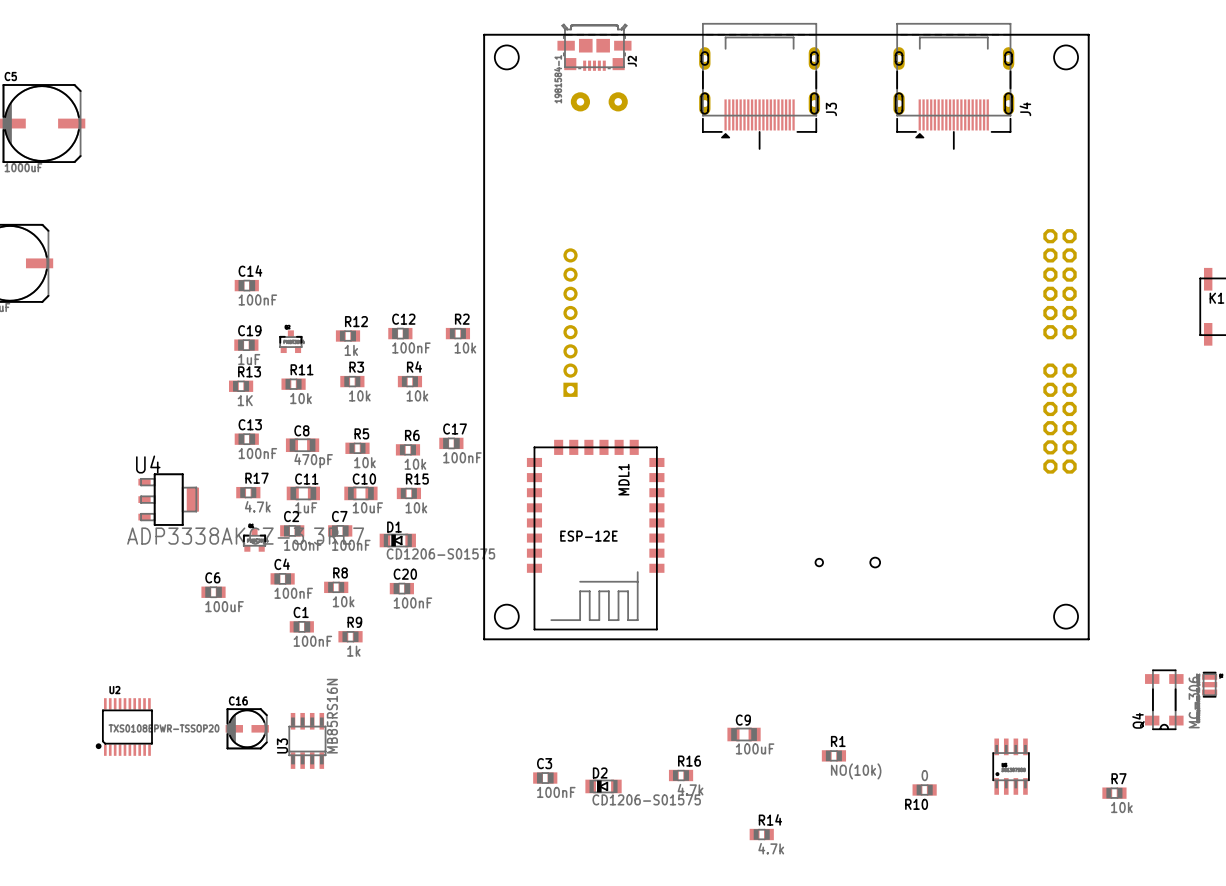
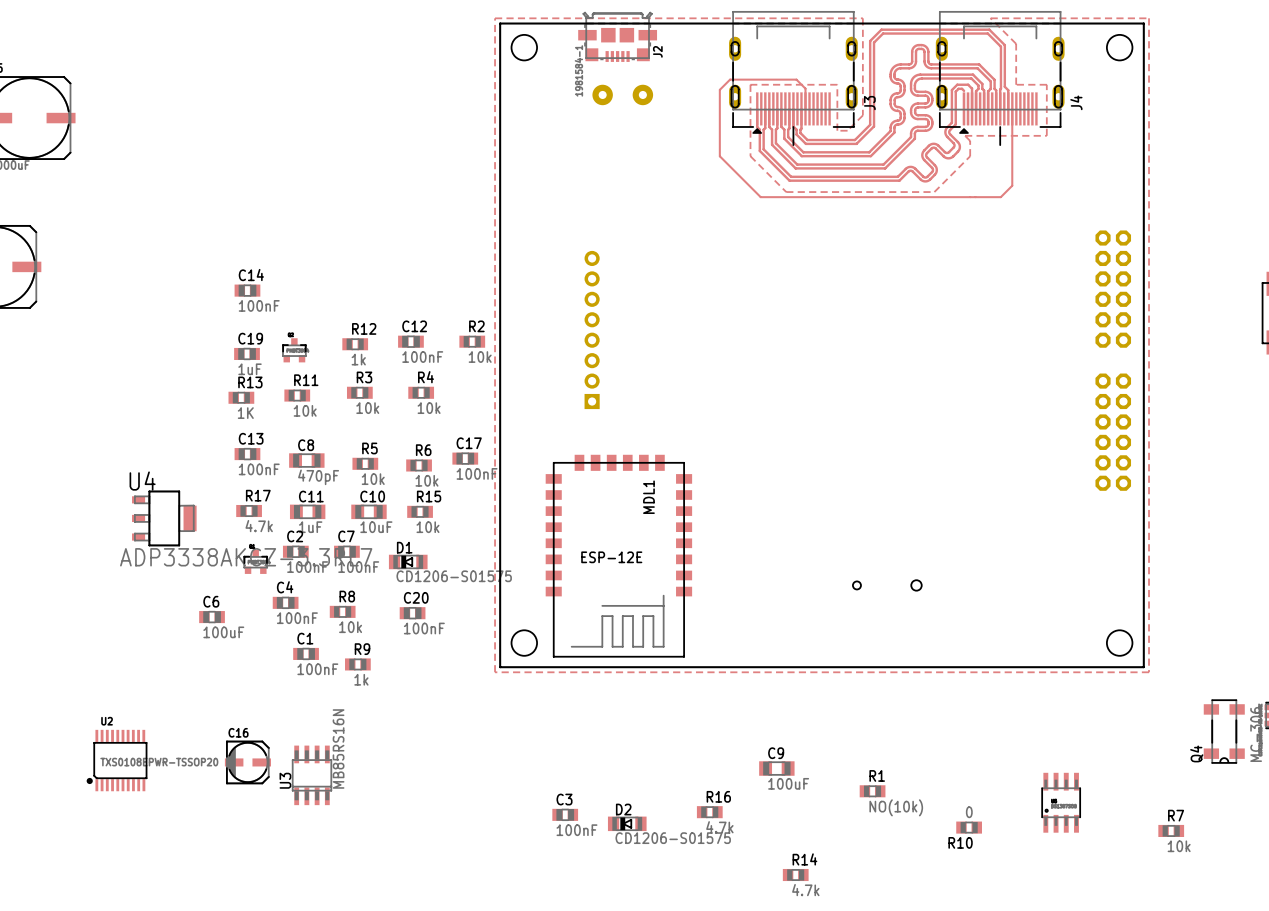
zone outline: none -> (495, 18) (862, 18) (862, 115) (847, 130) (837, 130) (837, 84) (750, 84) (750, 156) (786, 192) (934, 192) (970, 156) (970, 140) (965, 135) (1046, 135) (1046, 84) (1016, 84) (1016, 43) (990, 18) (1149, 18) (1149, 672) (495, 672) (495, 18)
track: none -> (964, 90) (958, 88) (955, 91) (955, 124) (949, 131) (958, 143) (959, 149) (952, 156) (948, 158) (935, 148) (931, 148) (926, 156) (935, 165) (936, 170) (926, 181) (921, 179) (910, 170) (899, 180) (789, 180) (759, 150) (757, 108)
track: none -> (765, 108) (763, 149) (791, 176) (897, 176) (910, 166) (925, 177) (932, 169) (922, 157) (924, 150) (930, 144) (934, 143) (947, 152) (954, 146) (945, 132) (951, 122) (951, 90) (957, 84) (968, 84) (972, 88) (972, 108)
track: none -> (769, 108) (772, 144) (795, 168) (885, 168) (914, 138) (915, 131) (927, 130) (931, 126) (932, 120) (929, 116) (917, 115) (915, 112) (916, 107) (928, 106) (932, 101) (931, 96) (928, 92) (915, 90) (915, 82) (920, 78) (971, 78) (978, 85) (976, 91) (976, 108)
track: none -> (777, 108) (775, 143) (797, 164) (883, 164) (911, 137) (913, 128) (928, 125) (926, 119) (915, 118) (911, 113) (913, 104) (926, 103) (928, 100) (926, 96) (916, 95) (911, 91) (911, 80) (917, 74) (973, 74) (982, 83) (984, 108)
track: none -> (781, 108) (781, 126) (784, 129) (784, 138) (801, 156) (870, 156) (894, 132) (895, 125) (904, 120) (904, 111) (895, 105) (894, 100) (903, 94) (904, 85) (901, 80) (895, 78) (894, 72) (898, 68) (914, 66) (916, 51) (919, 48) (924, 50) (924, 63) (929, 68) (977, 68) (990, 81) (990, 88) (988, 91) (988, 108)
track: none -> (789, 108) (788, 137) (803, 152) (869, 152) (890, 130) (892, 122) (900, 118) (900, 112) (893, 109) (890, 104) (892, 95) (900, 90) (900, 84) (891, 79) (891, 70) (896, 65) (911, 63) (912, 49) (919, 45) (927, 48) (928, 61) (930, 64) (979, 64) (994, 79) (996, 108)
track: none -> (793, 108) (793, 126) (796, 129) (796, 134) (805, 143) (856, 143) (874, 126) (874, 42) (883, 33) (987, 33) (1000, 46) (1000, 108)
track: none -> (801, 108) (800, 133) (807, 140) (854, 140) (870, 124) (870, 41) (881, 29) (989, 29) (1004, 45) (1004, 86) (1008, 90) (1008, 108)
track: none -> (805, 108) (805, 88) (796, 79) (730, 79) (719, 89) (719, 156) (760, 197) (1000, 197) (1012, 185) (1012, 108)

